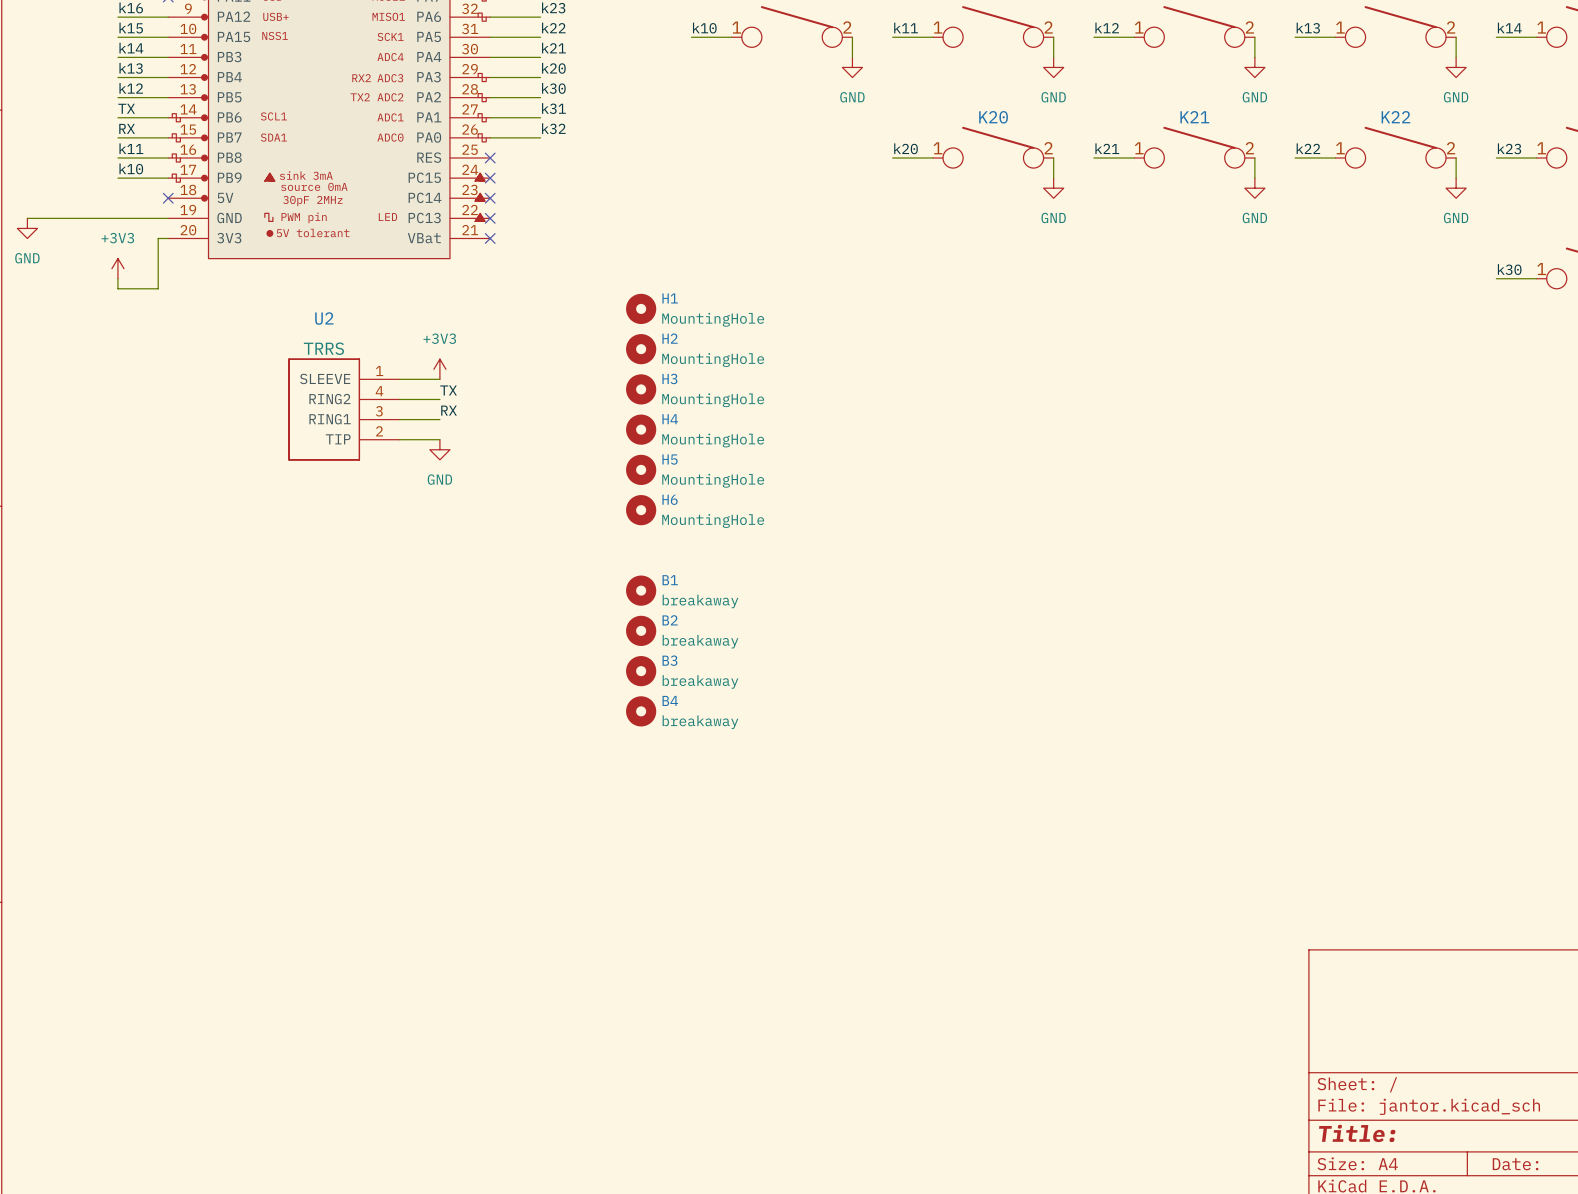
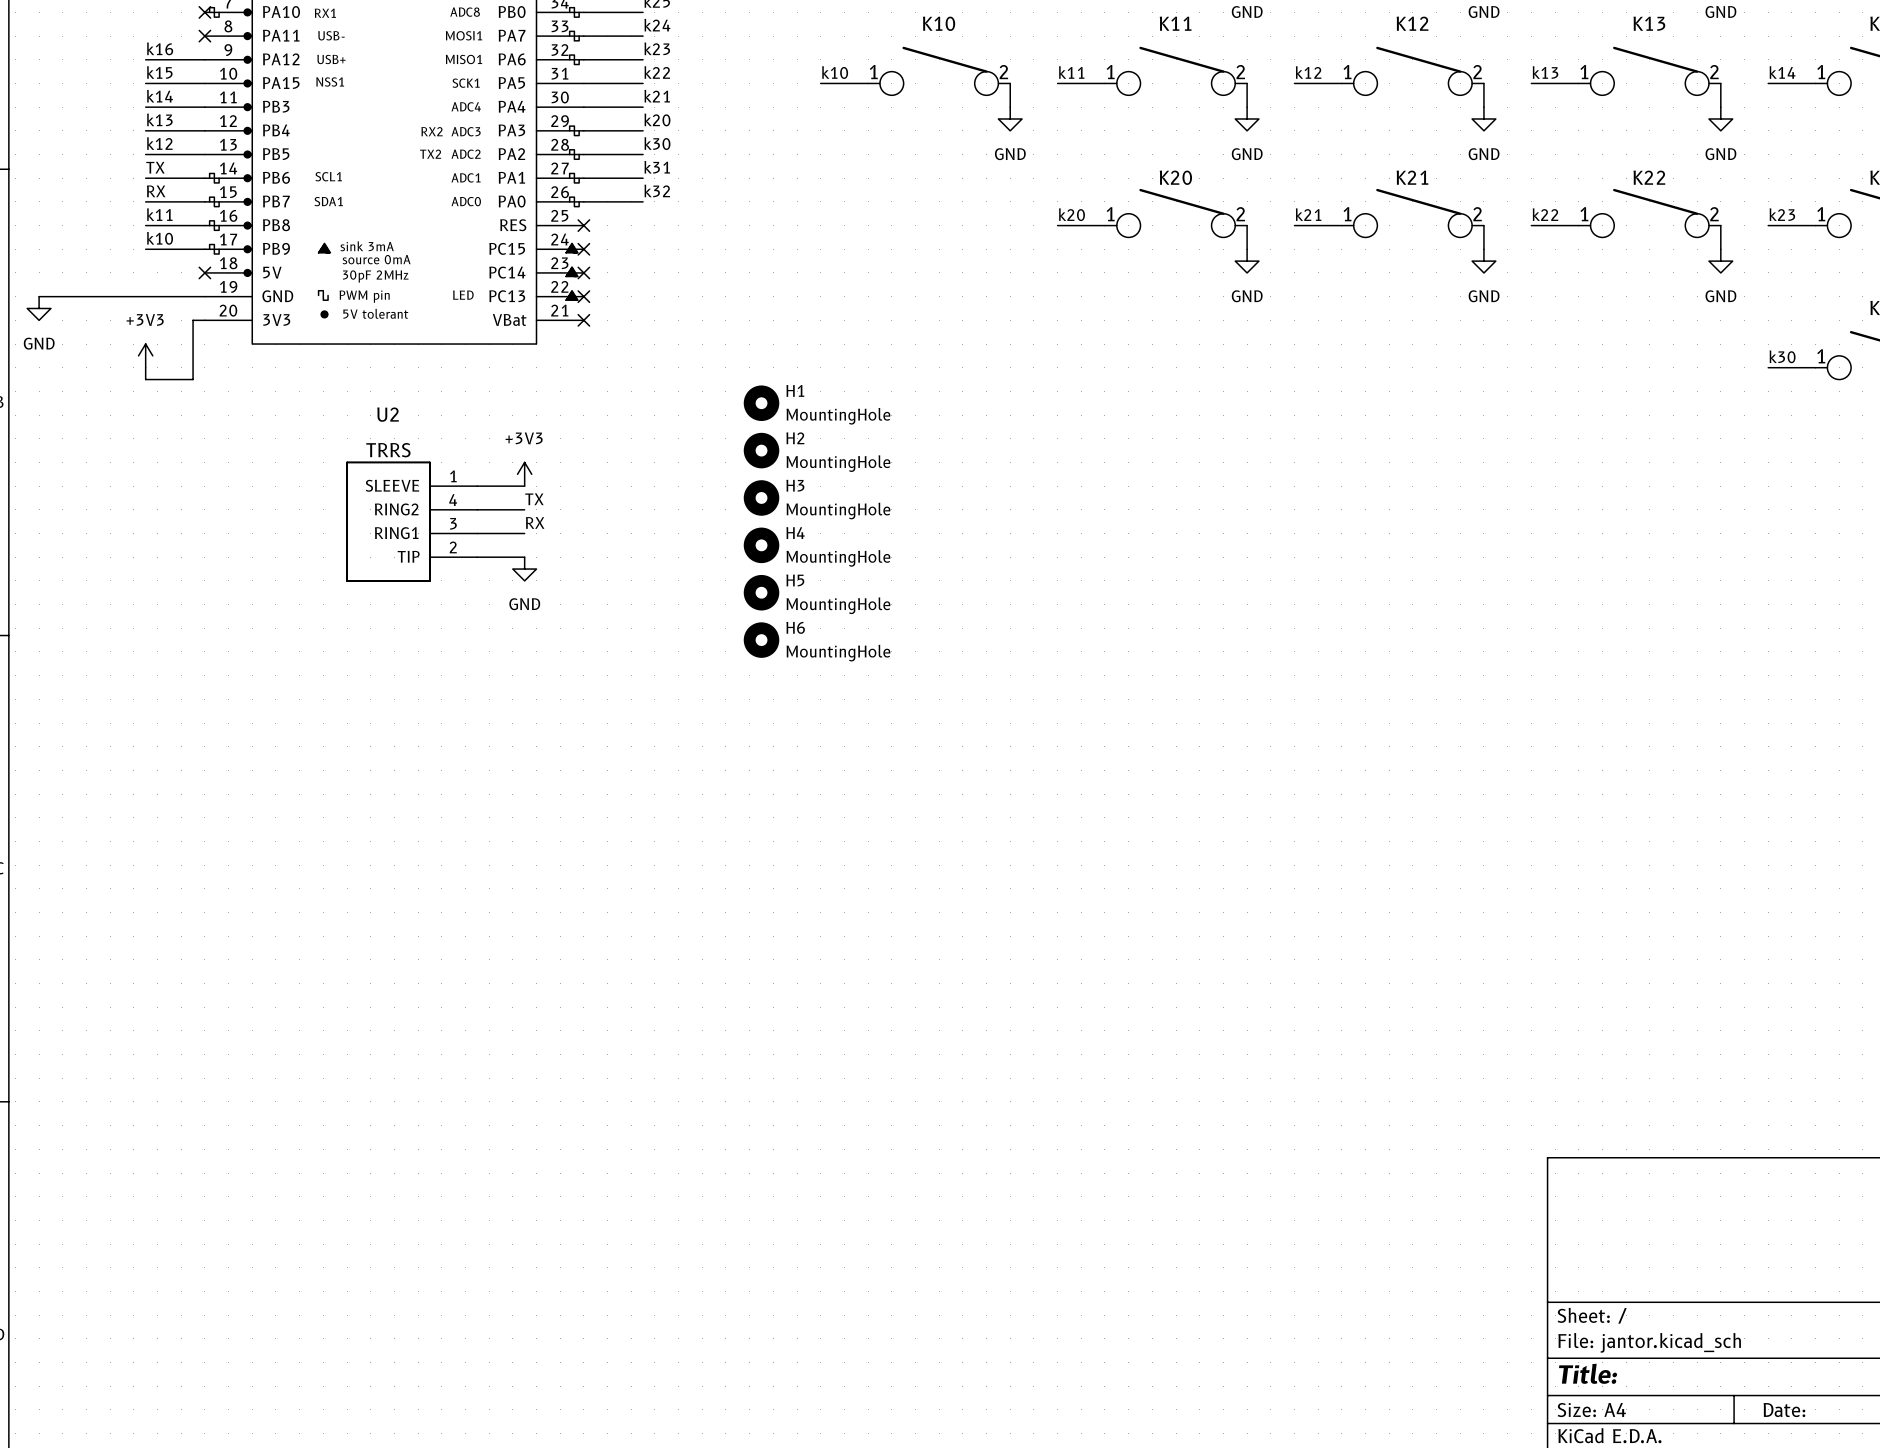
B1: breakaway (641, 590) -> none
B2: breakaway (641, 630) -> none
B3: breakaway (641, 671) -> none
B4: breakaway (641, 711) -> none

